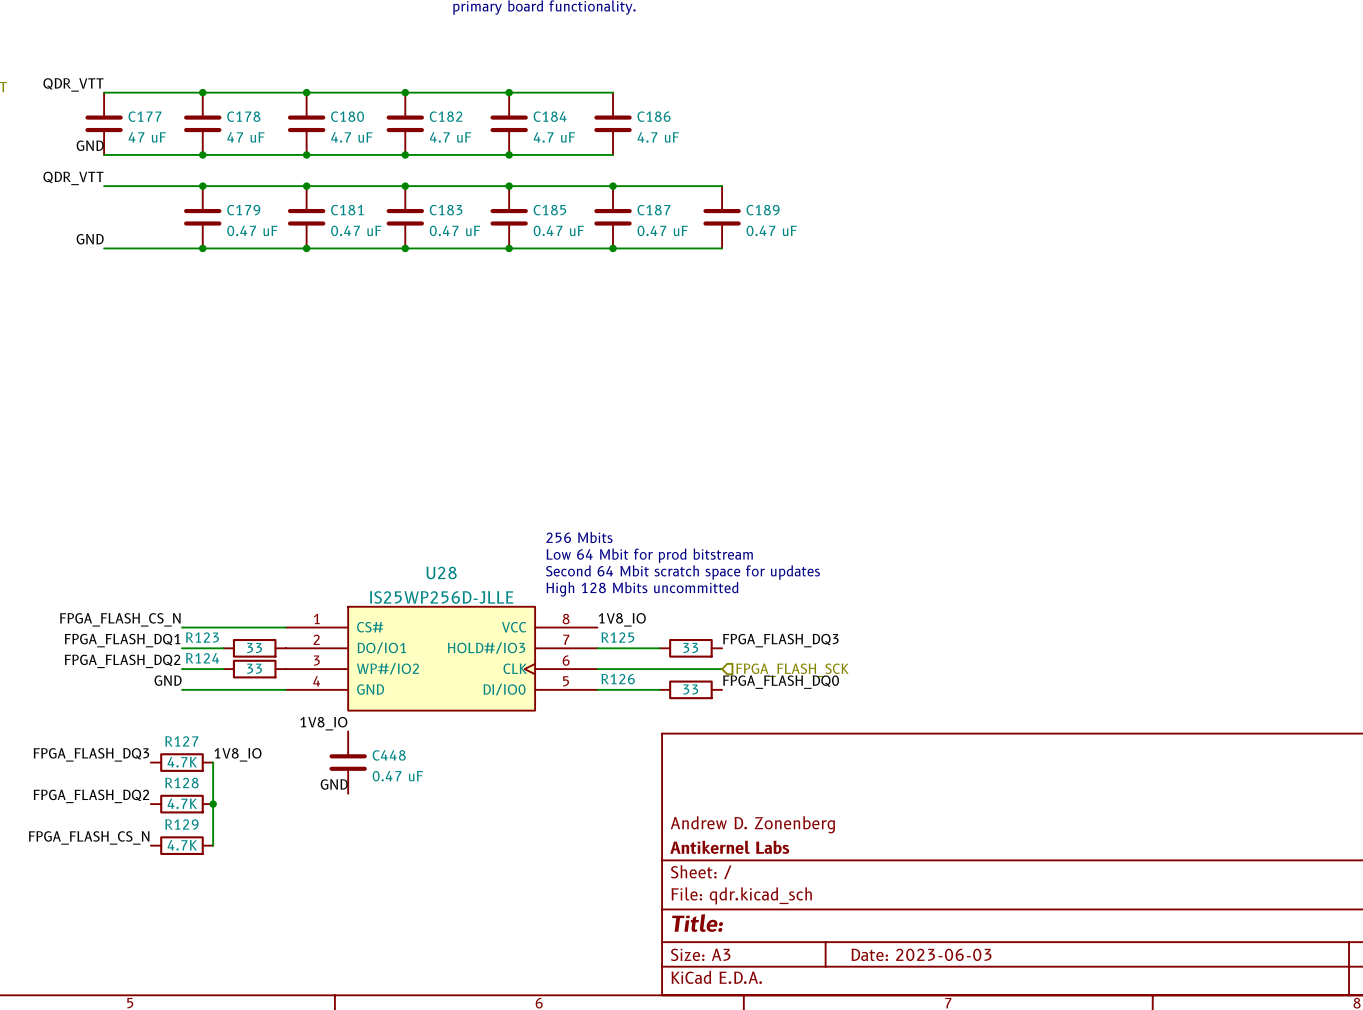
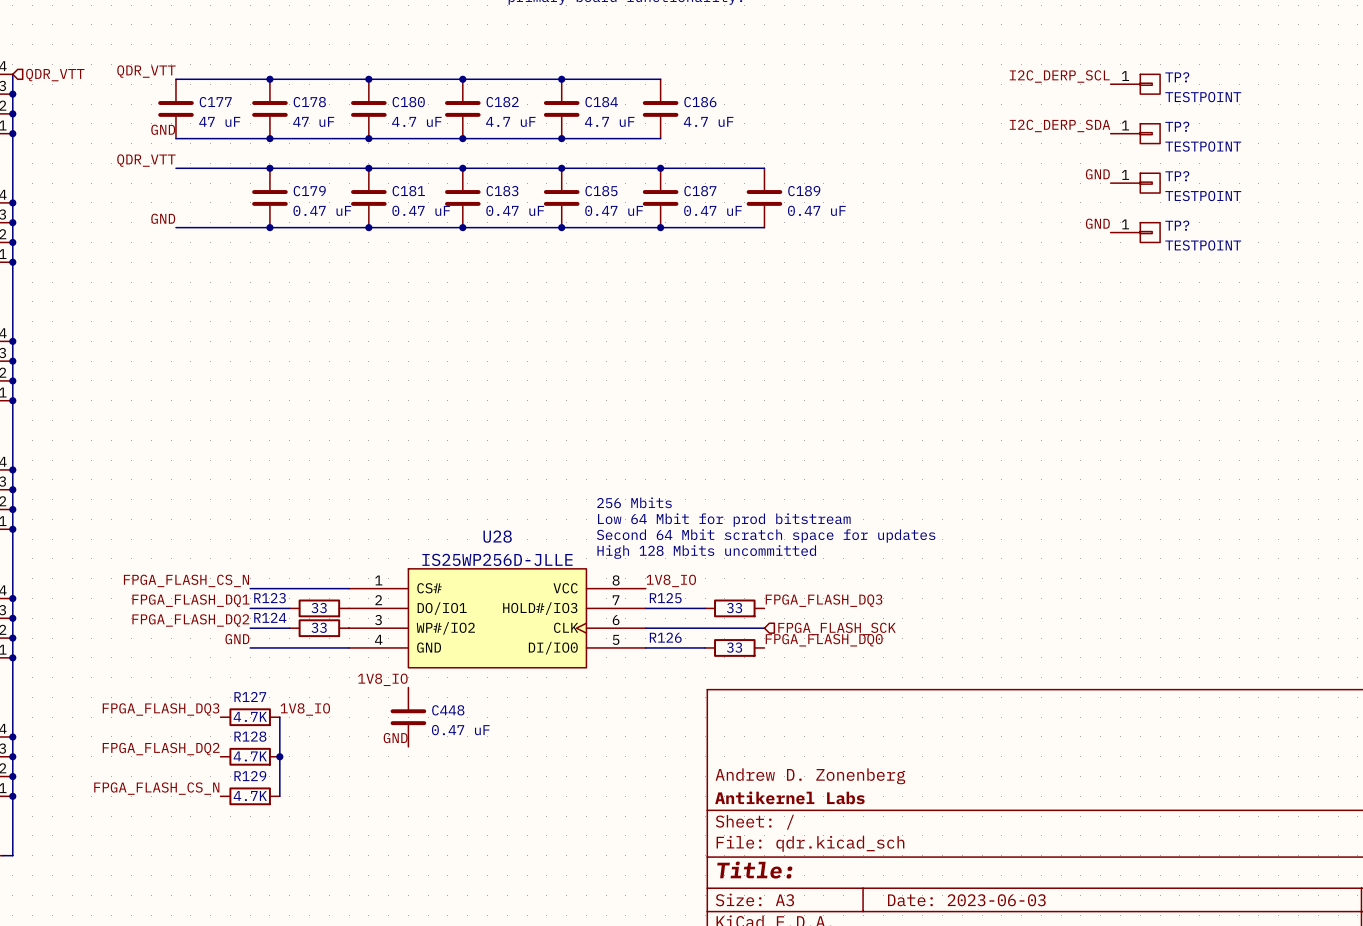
label: none -> I2C_DERP_SCL (1059, 76)
TP?: none -> TESTPOINT (1135, 84)
label: none -> I2C_DERP_SDA (1059, 125)
TP?: none -> TESTPOINT (1135, 133)
label: none -> GND (1097, 174)
TP?: none -> TESTPOINT (1135, 183)
label: none -> GND (1097, 223)
TP?: none -> TESTPOINT (1135, 232)

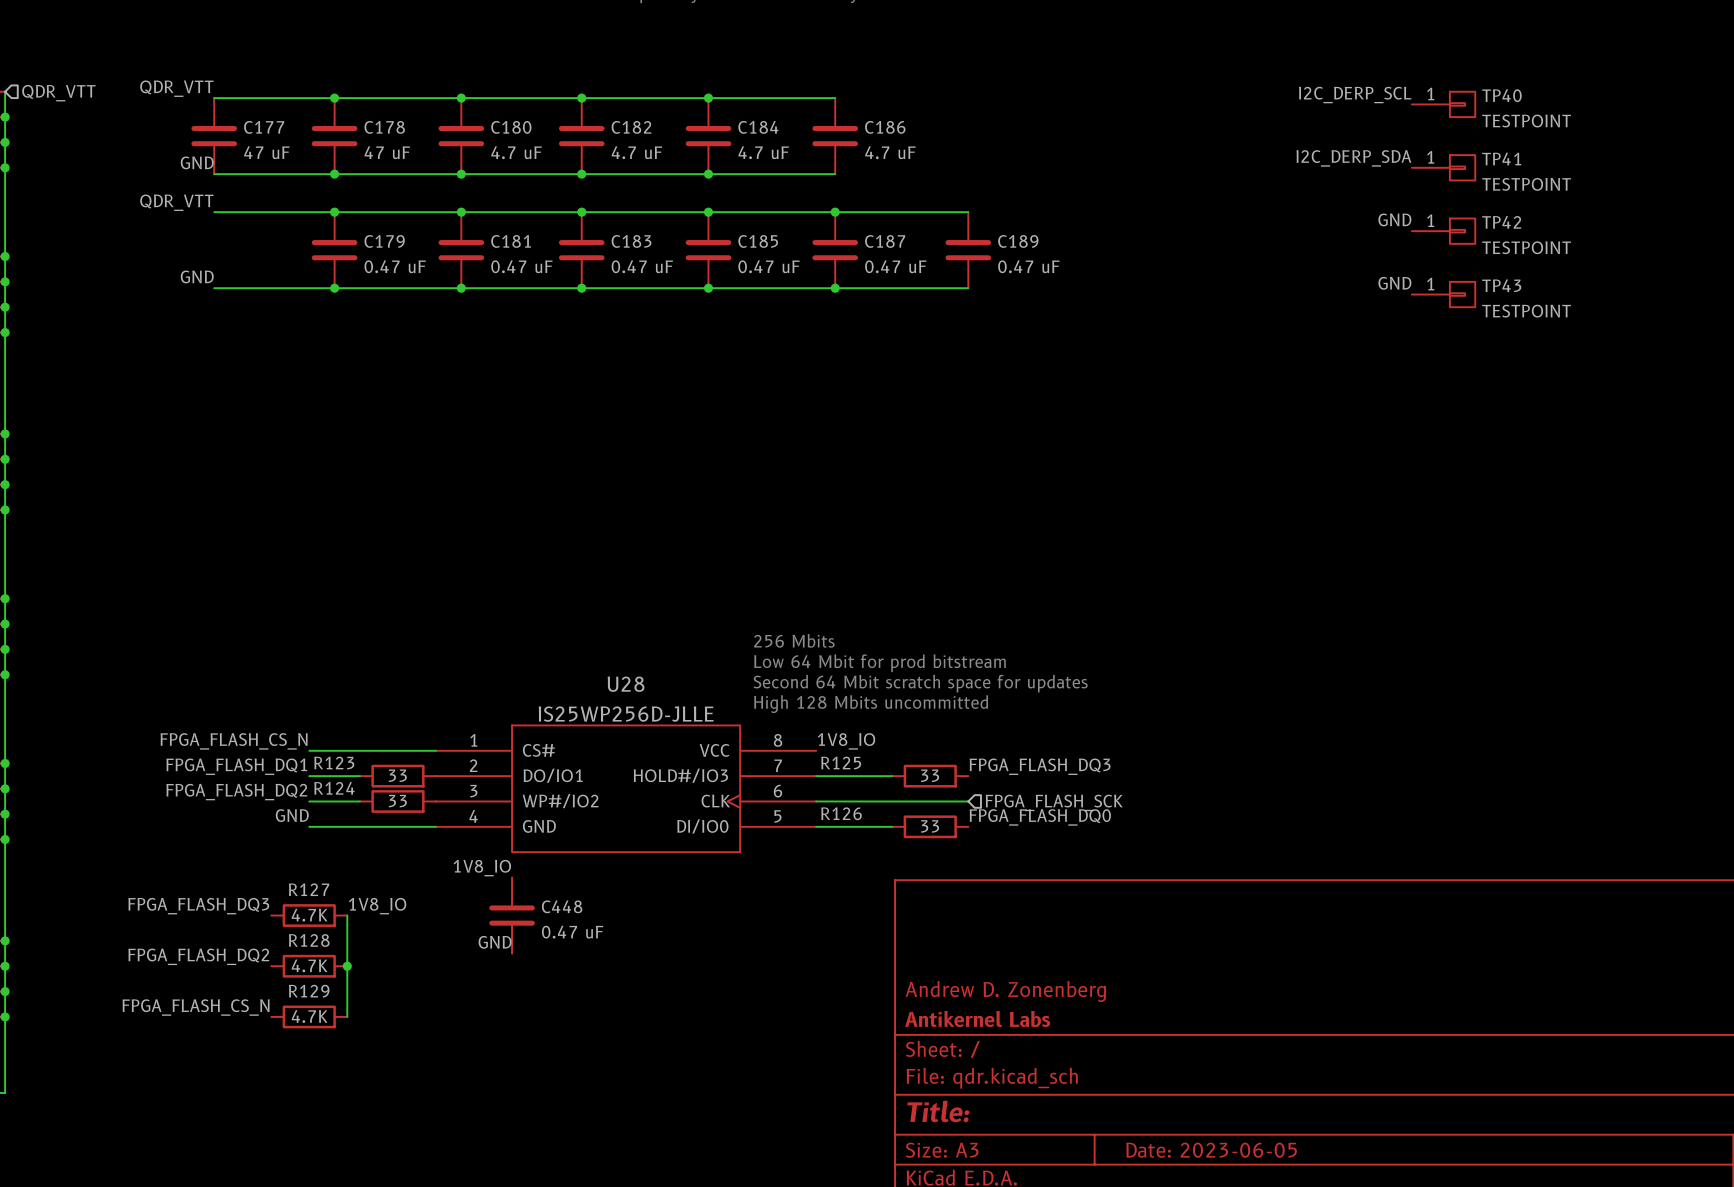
TP? name: TP? (1177, 77) -> TP40 (1501, 95)
TP? name: TP? (1177, 126) -> TP41 (1501, 159)
TP? name: TP? (1177, 176) -> TP42 (1501, 222)
TP? name: TP? (1177, 225) -> TP43 (1501, 285)
title block: Date: 2023-06-03 (966, 900) -> Date: 2023-06-05 (1211, 1150)

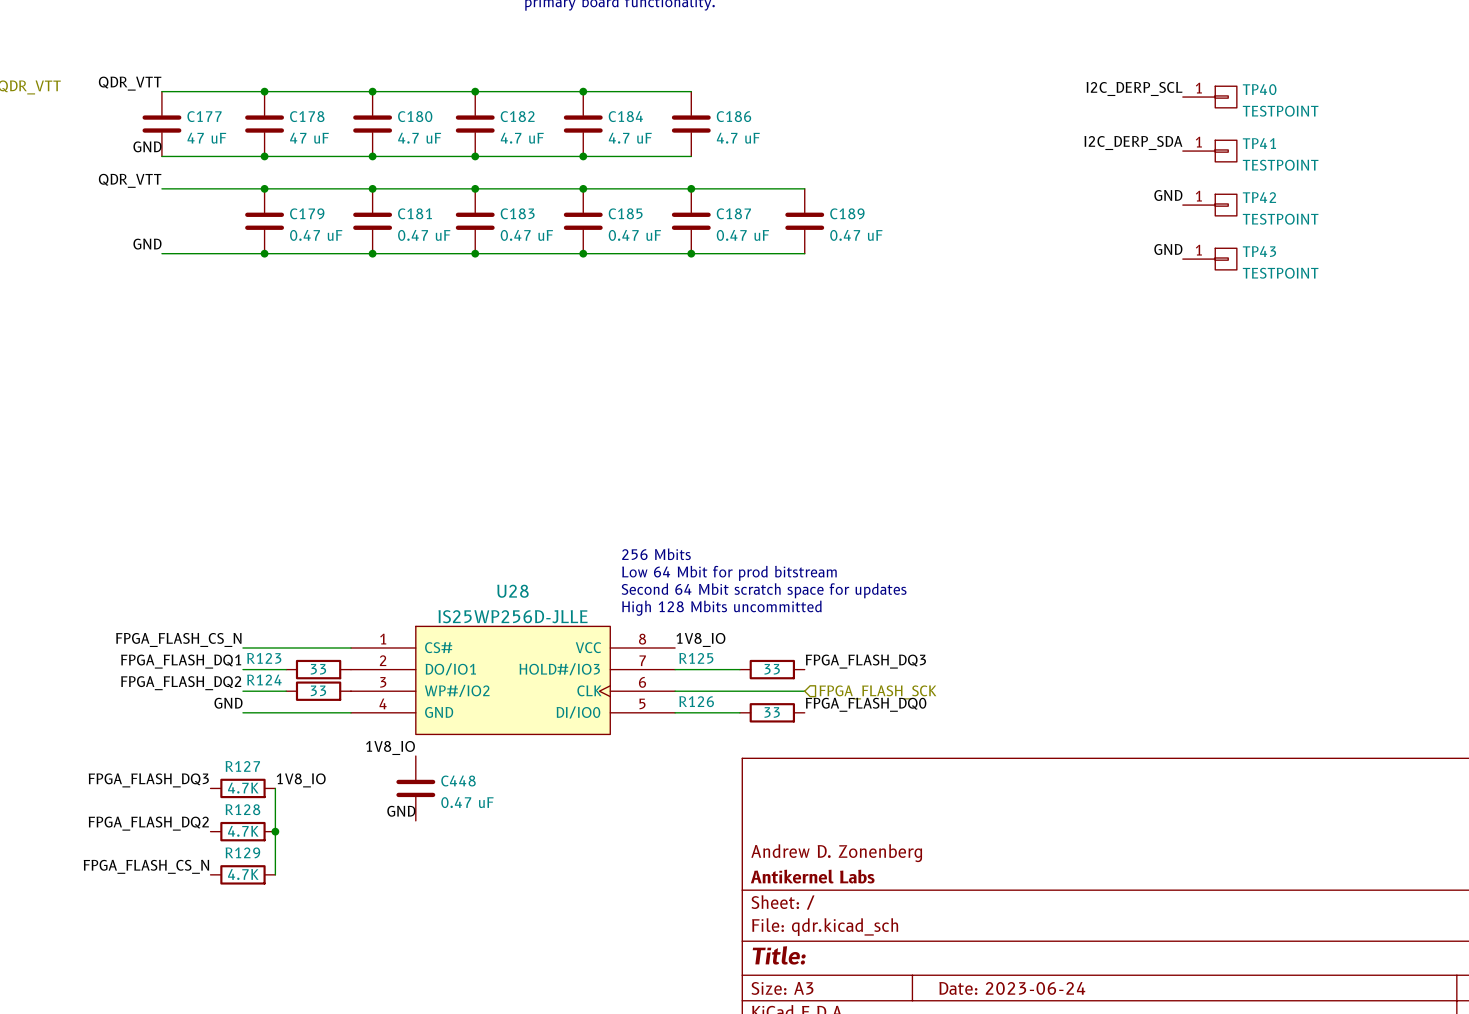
title block: Date: 2023-06-05 (1211, 1150) -> Date: 2023-06-24 (1012, 988)

